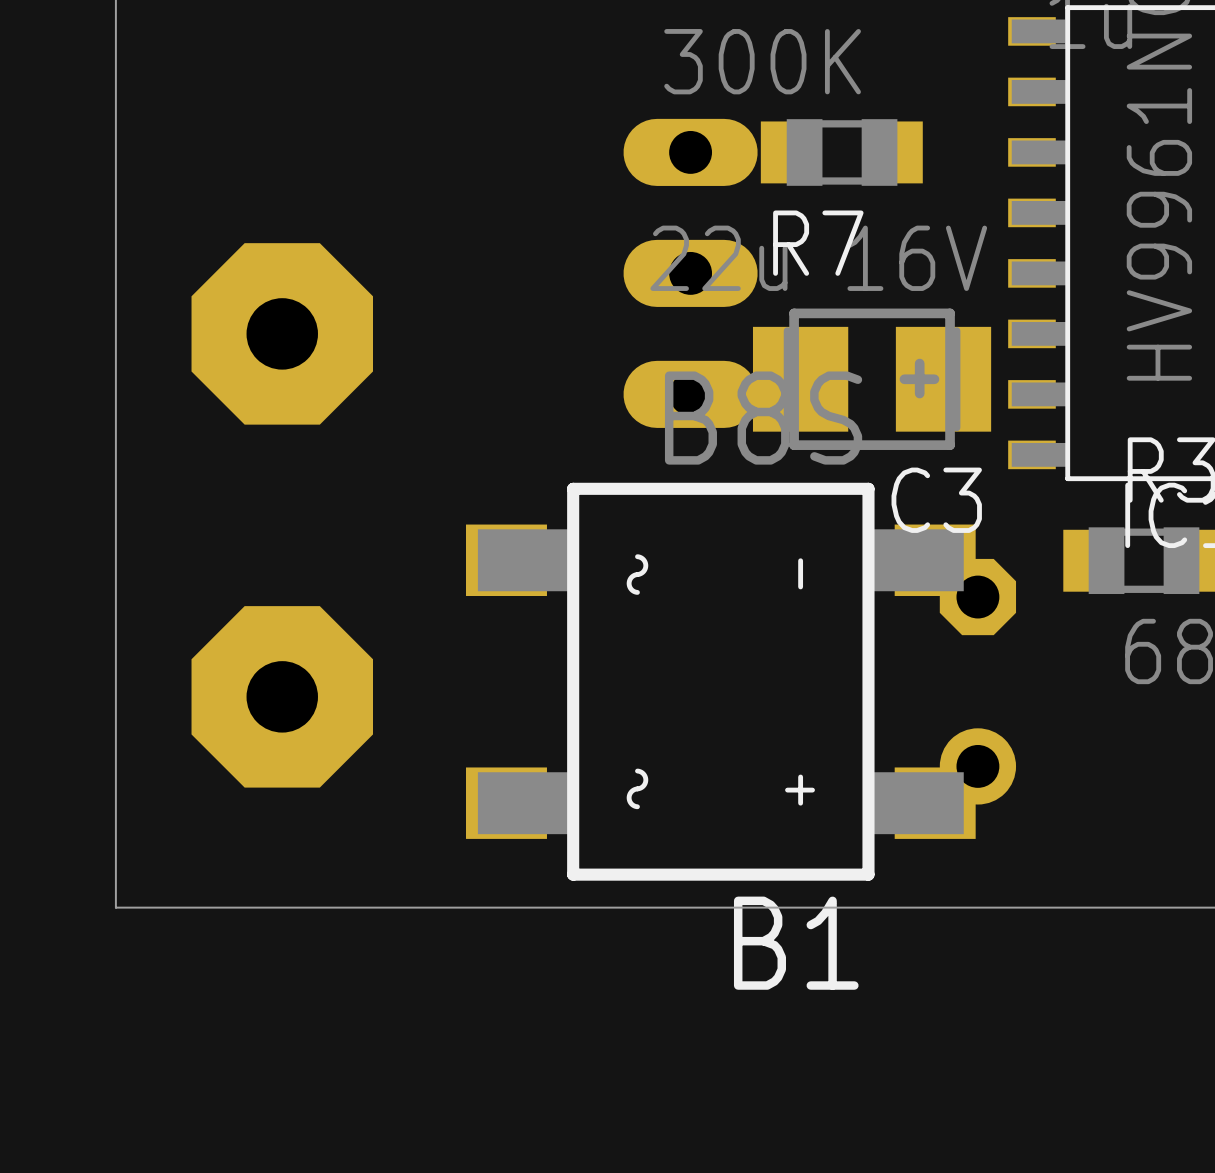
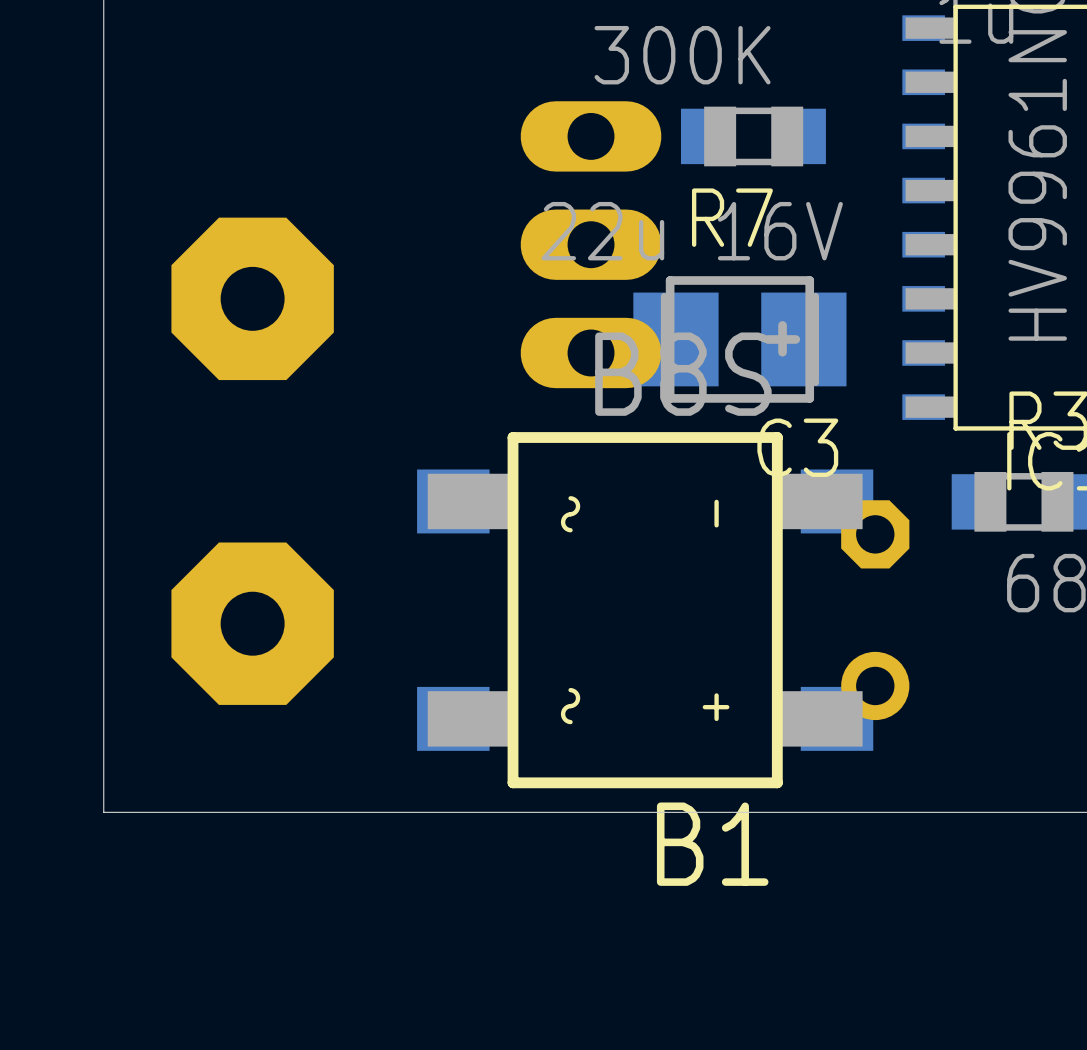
part footprint: [623, 118, 758, 428] -> [520, 101, 662, 389]
C3 position: (872, 379) -> (739, 339)

